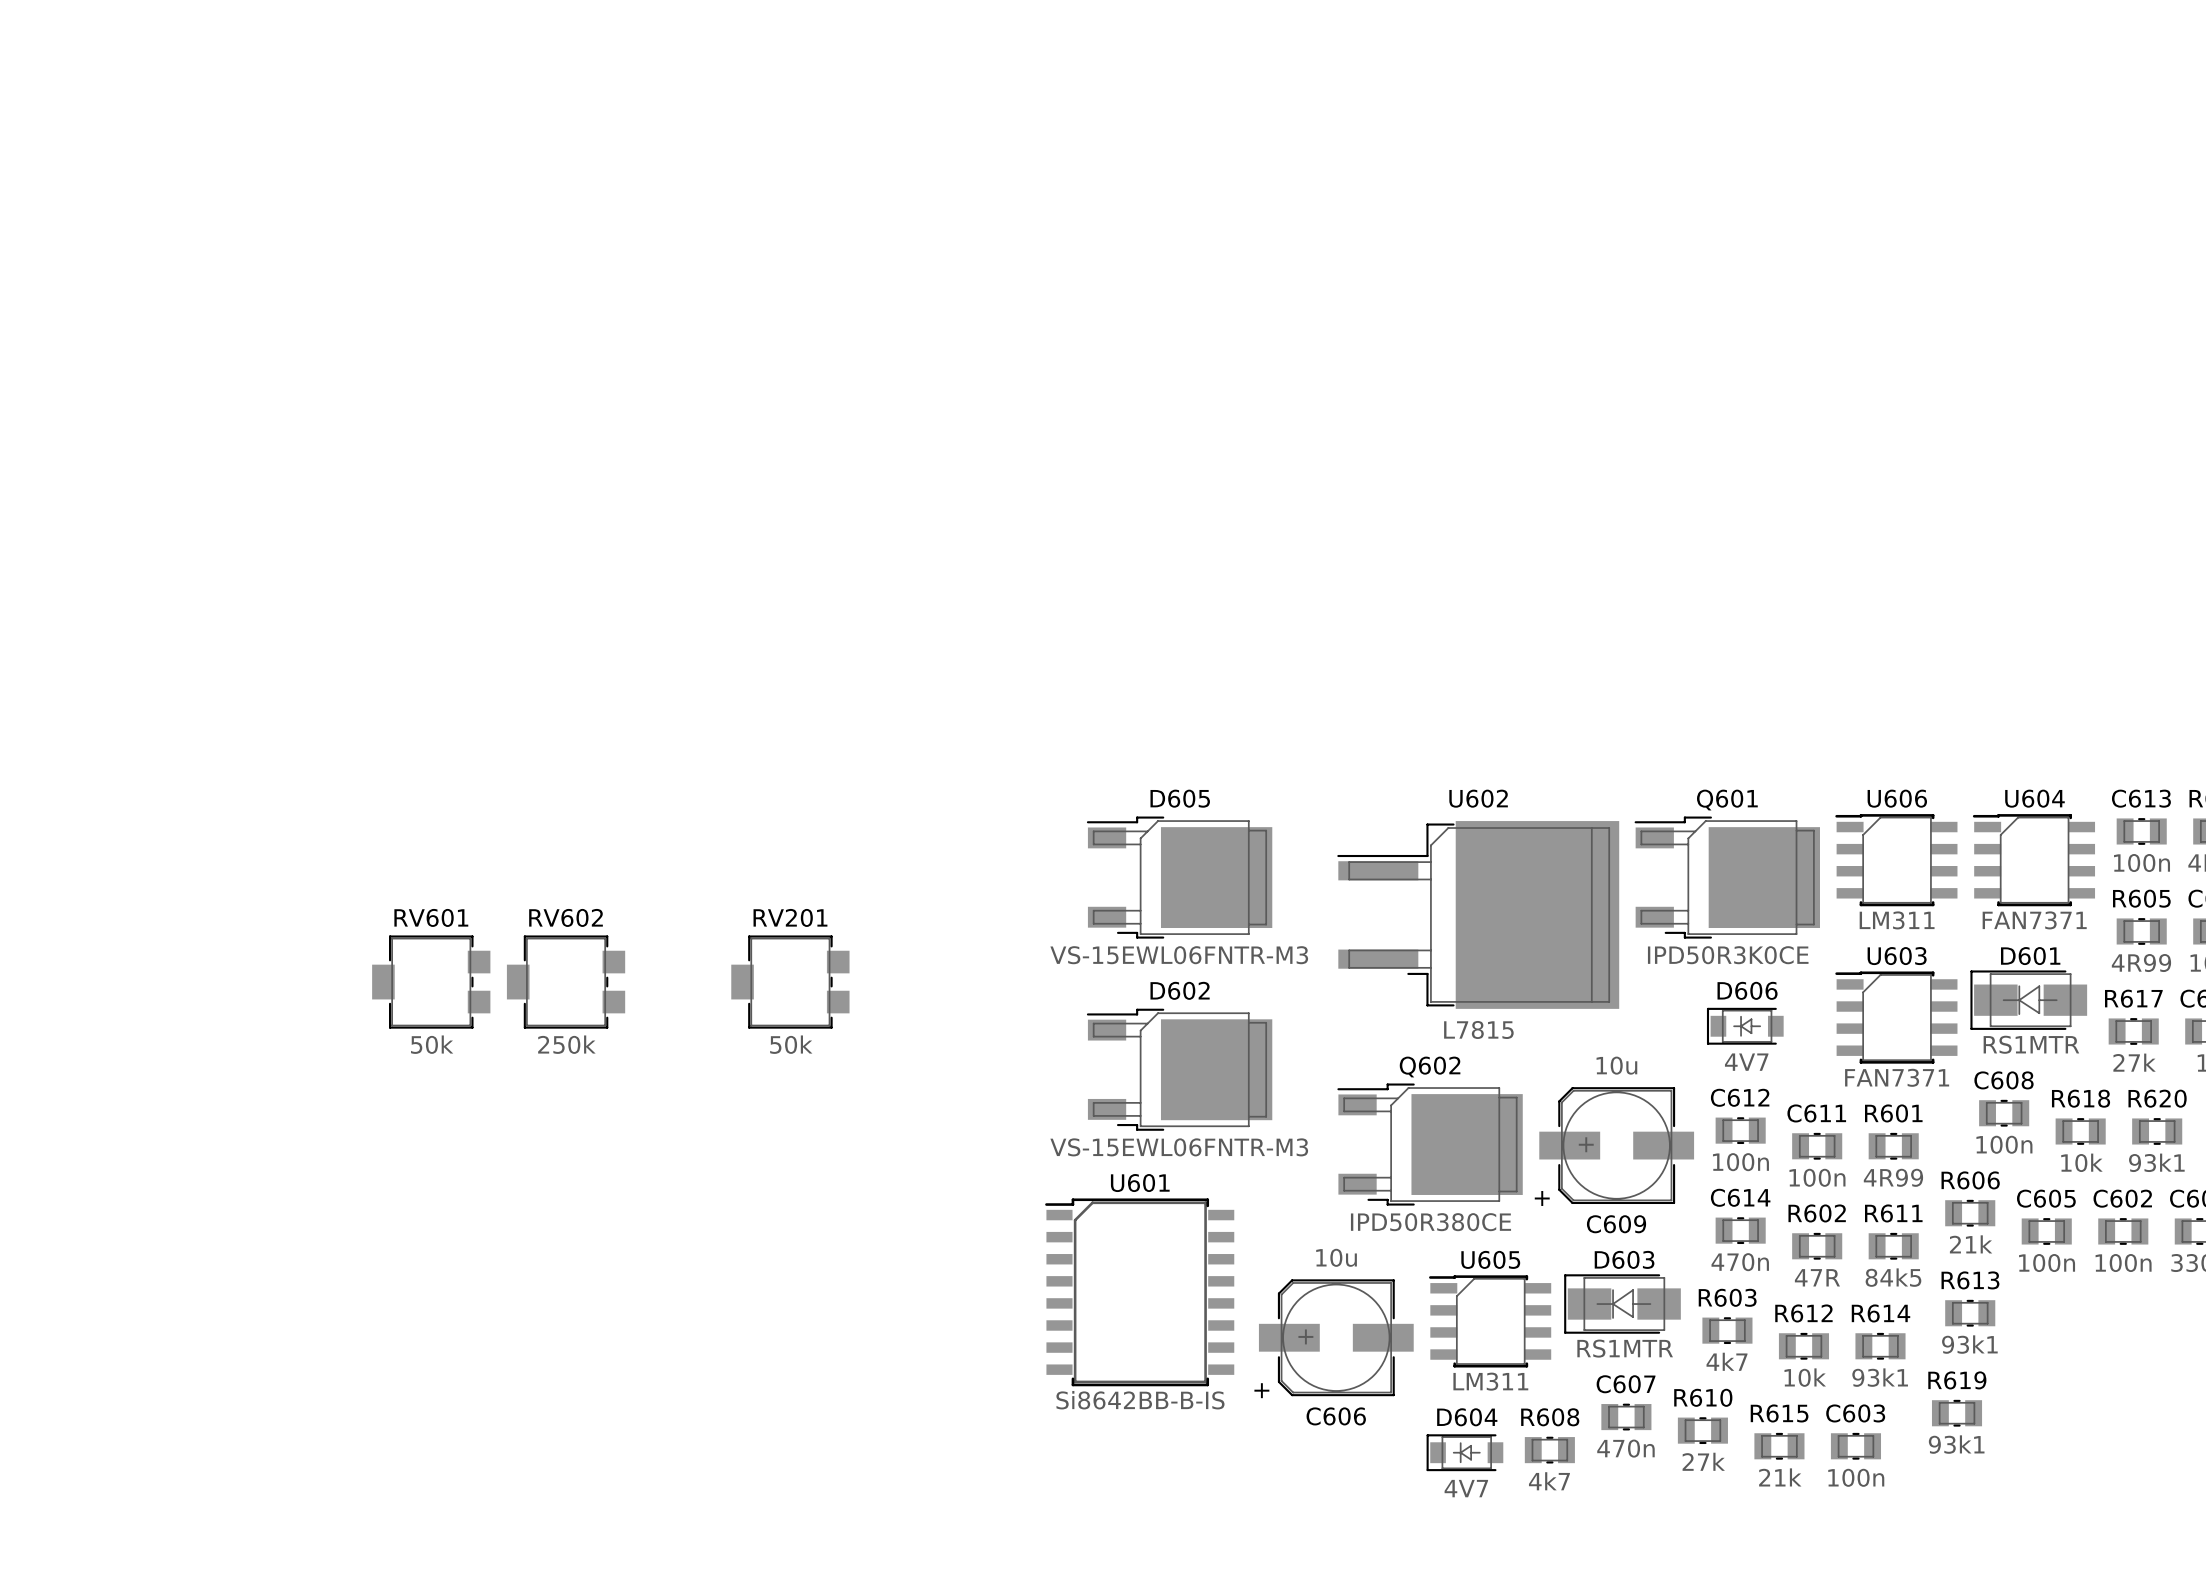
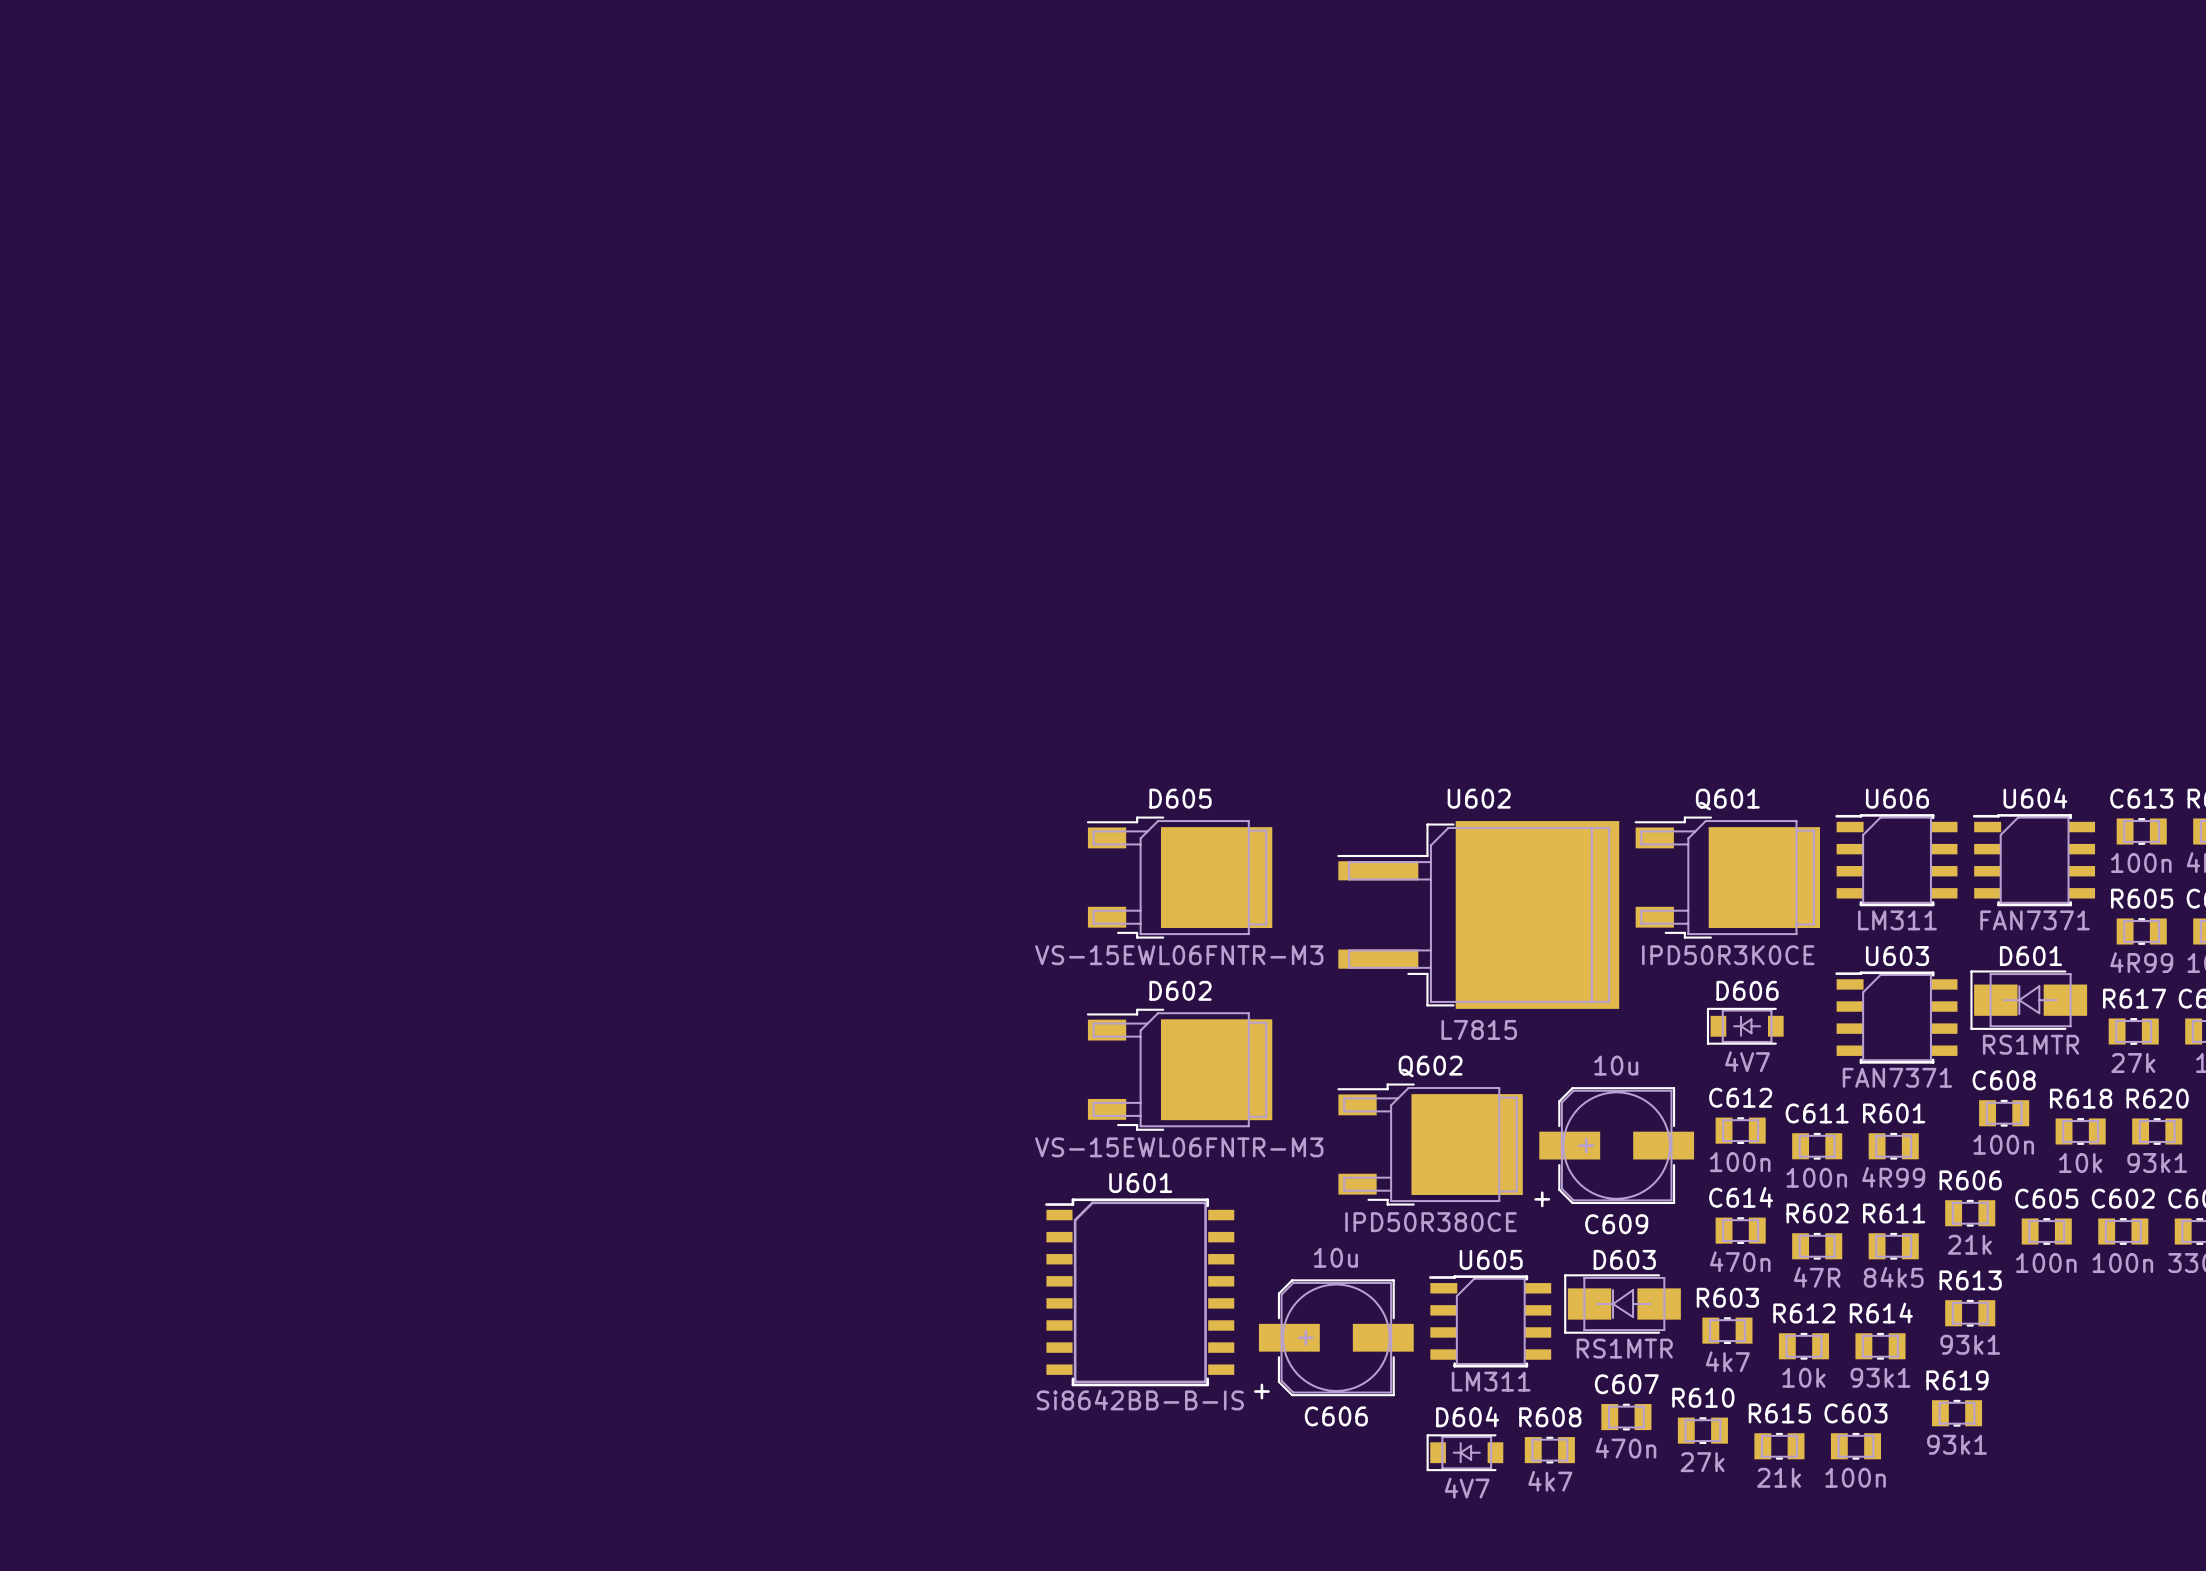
RV601: 50k (431, 982) -> none
RV602: 250k (566, 982) -> none
RV201: 50k (790, 982) -> none

